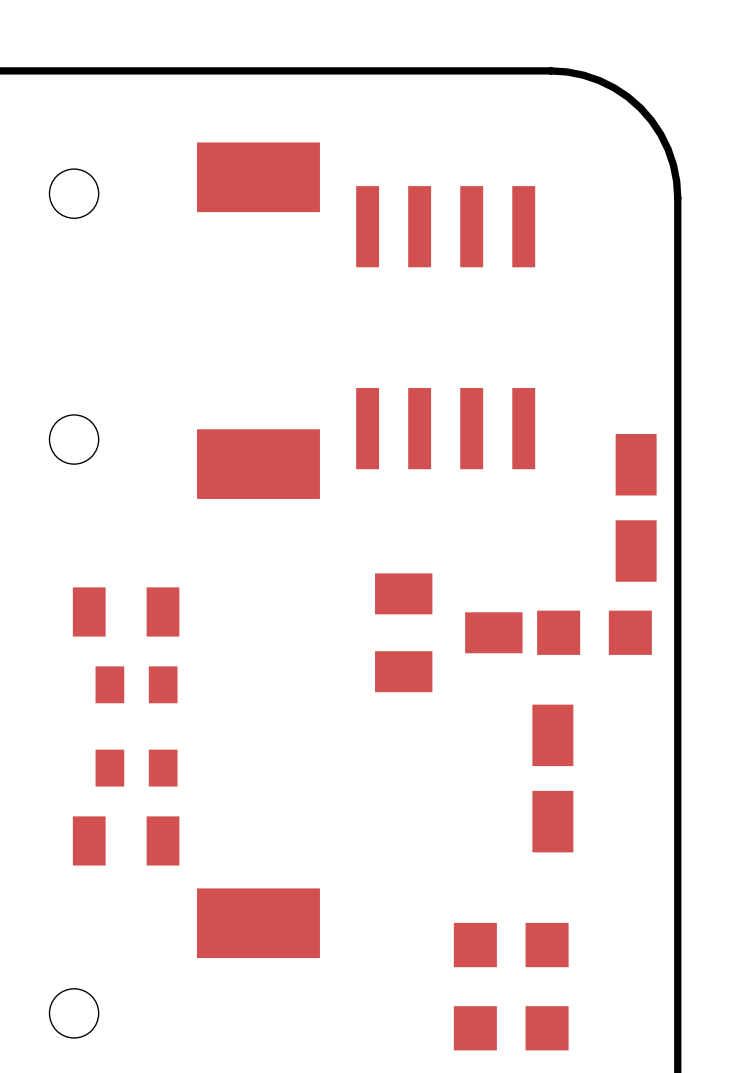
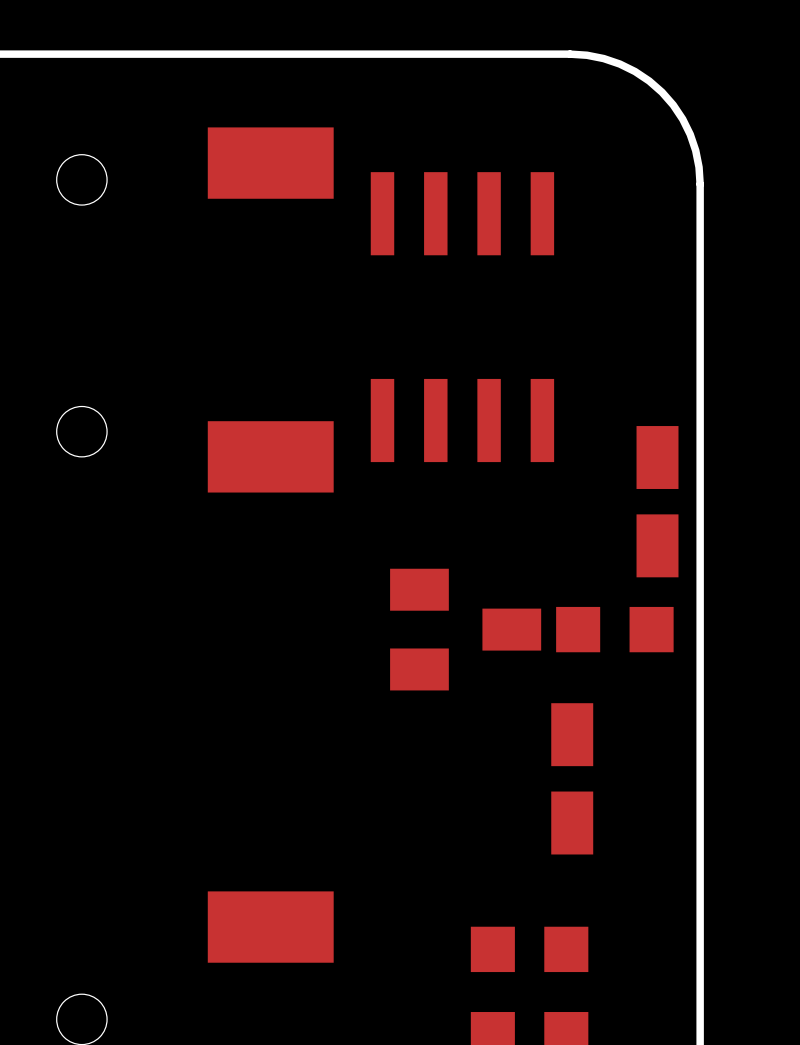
part: (126, 611) -> none
part: (136, 684) -> none
part: (136, 768) -> none
part: (126, 840) -> none

